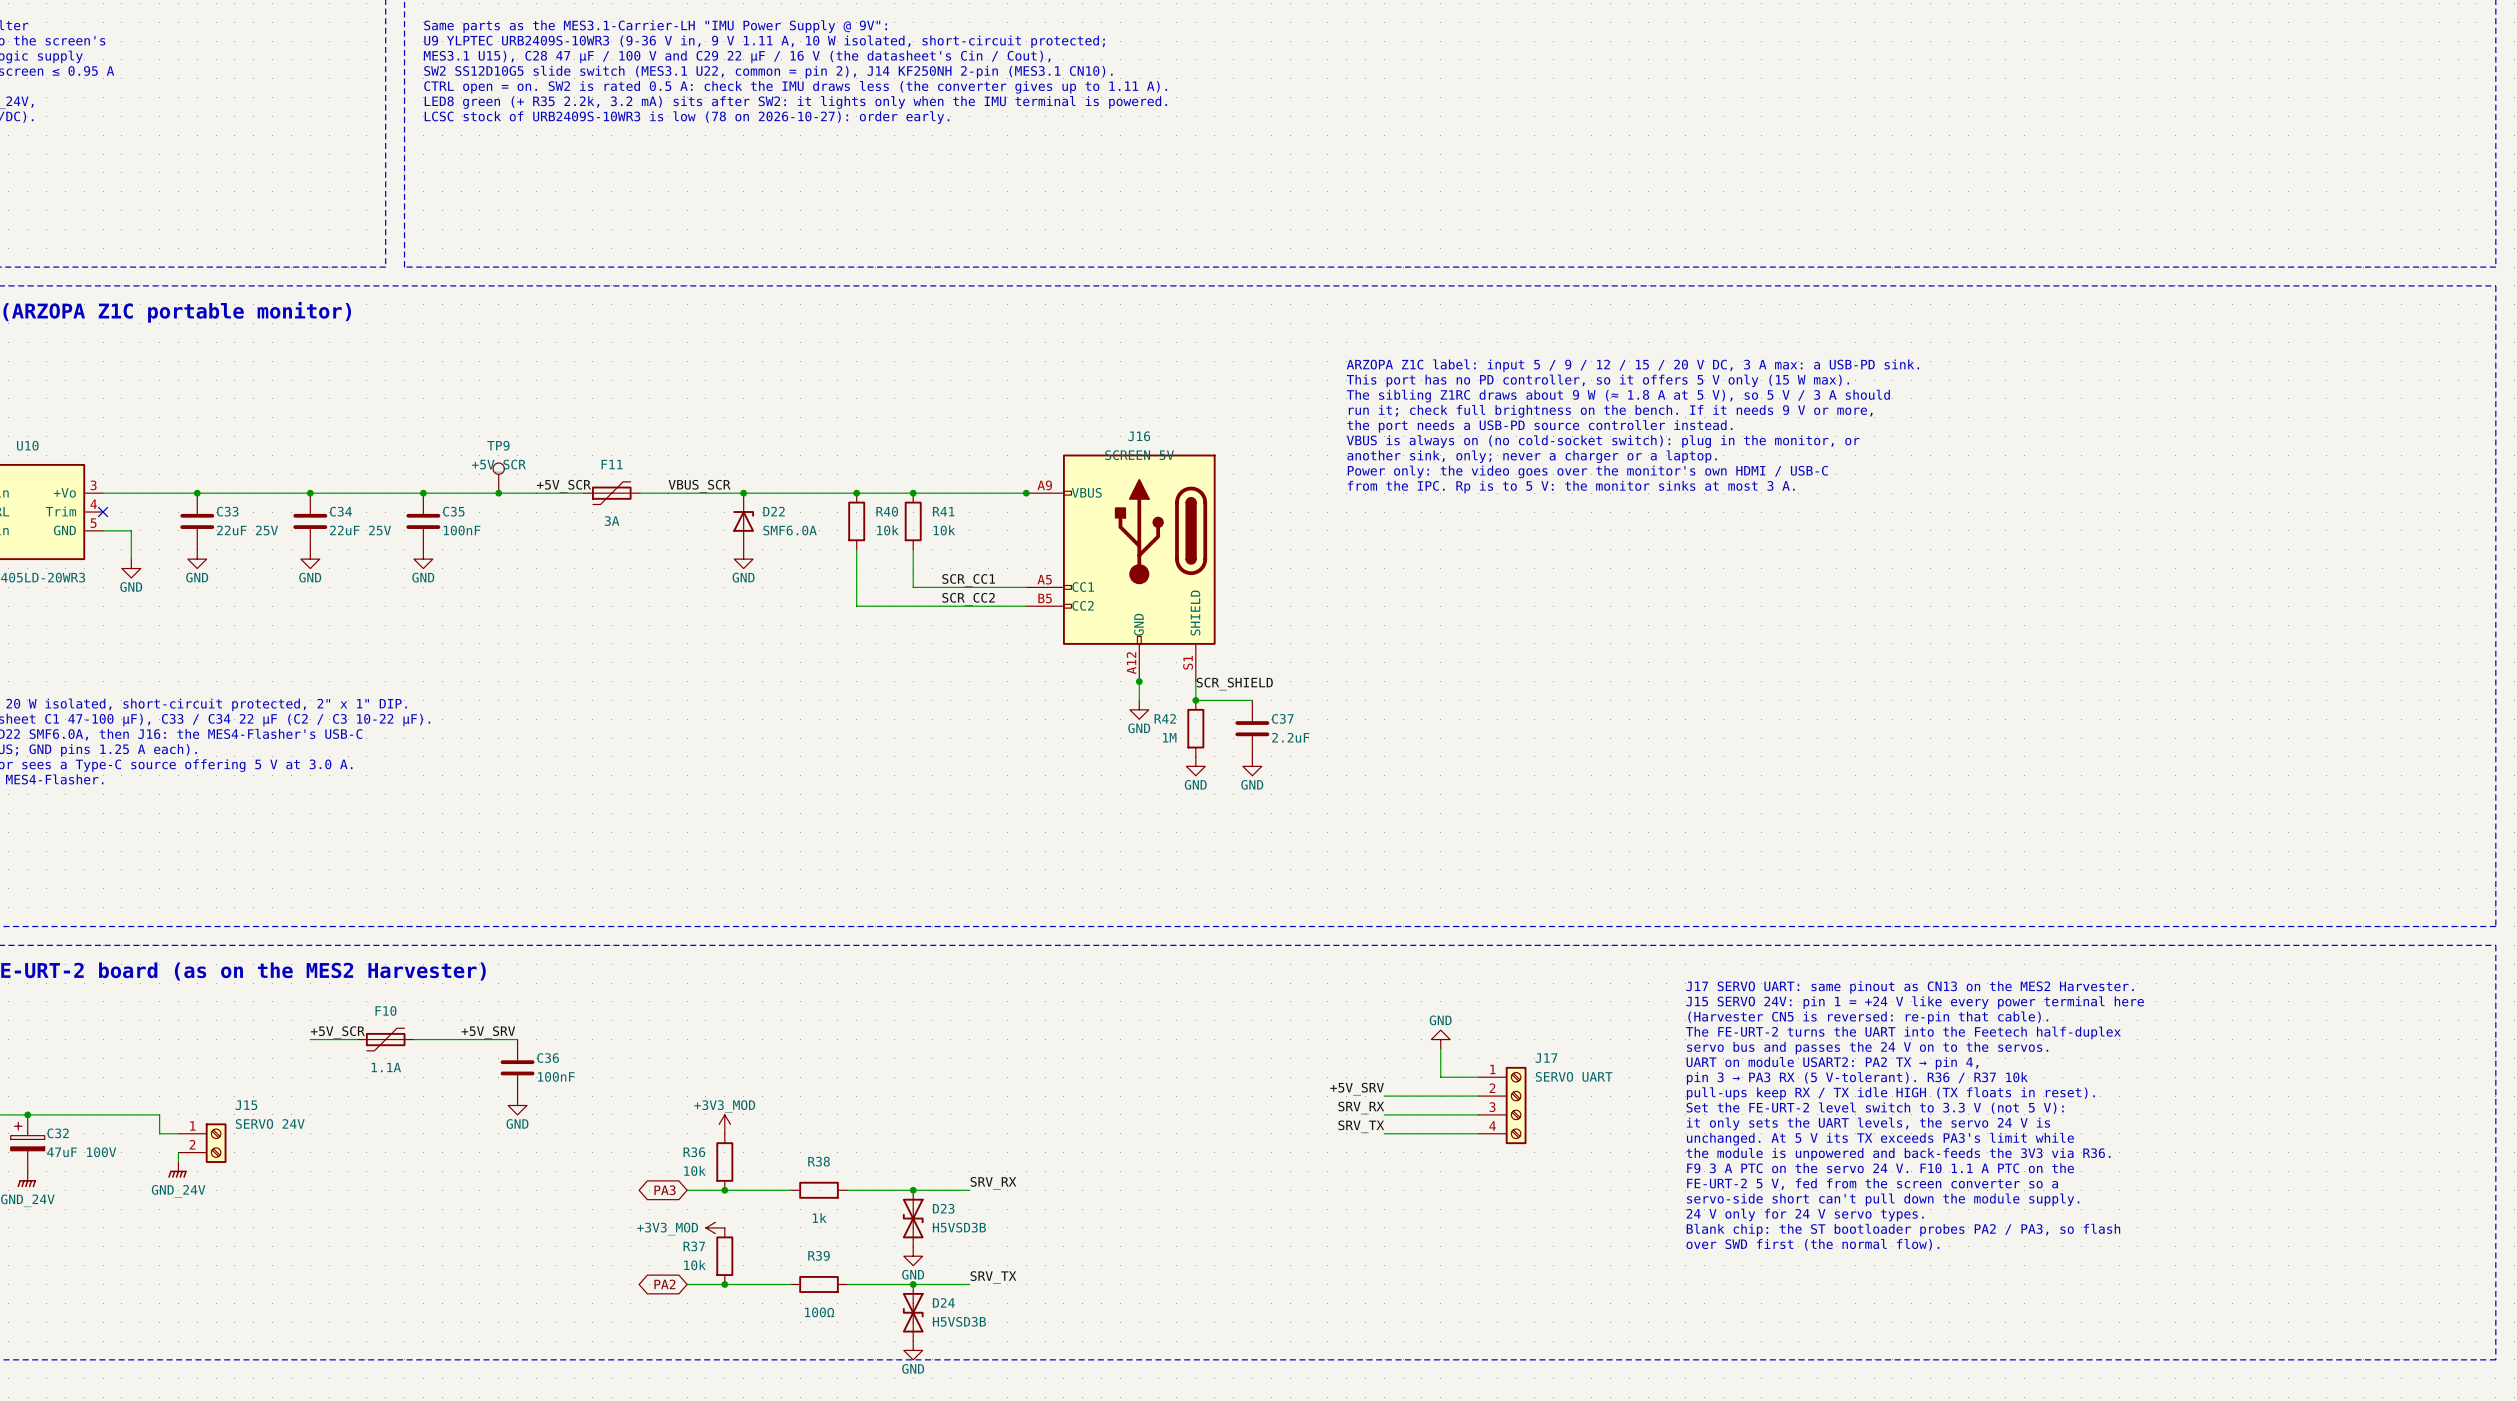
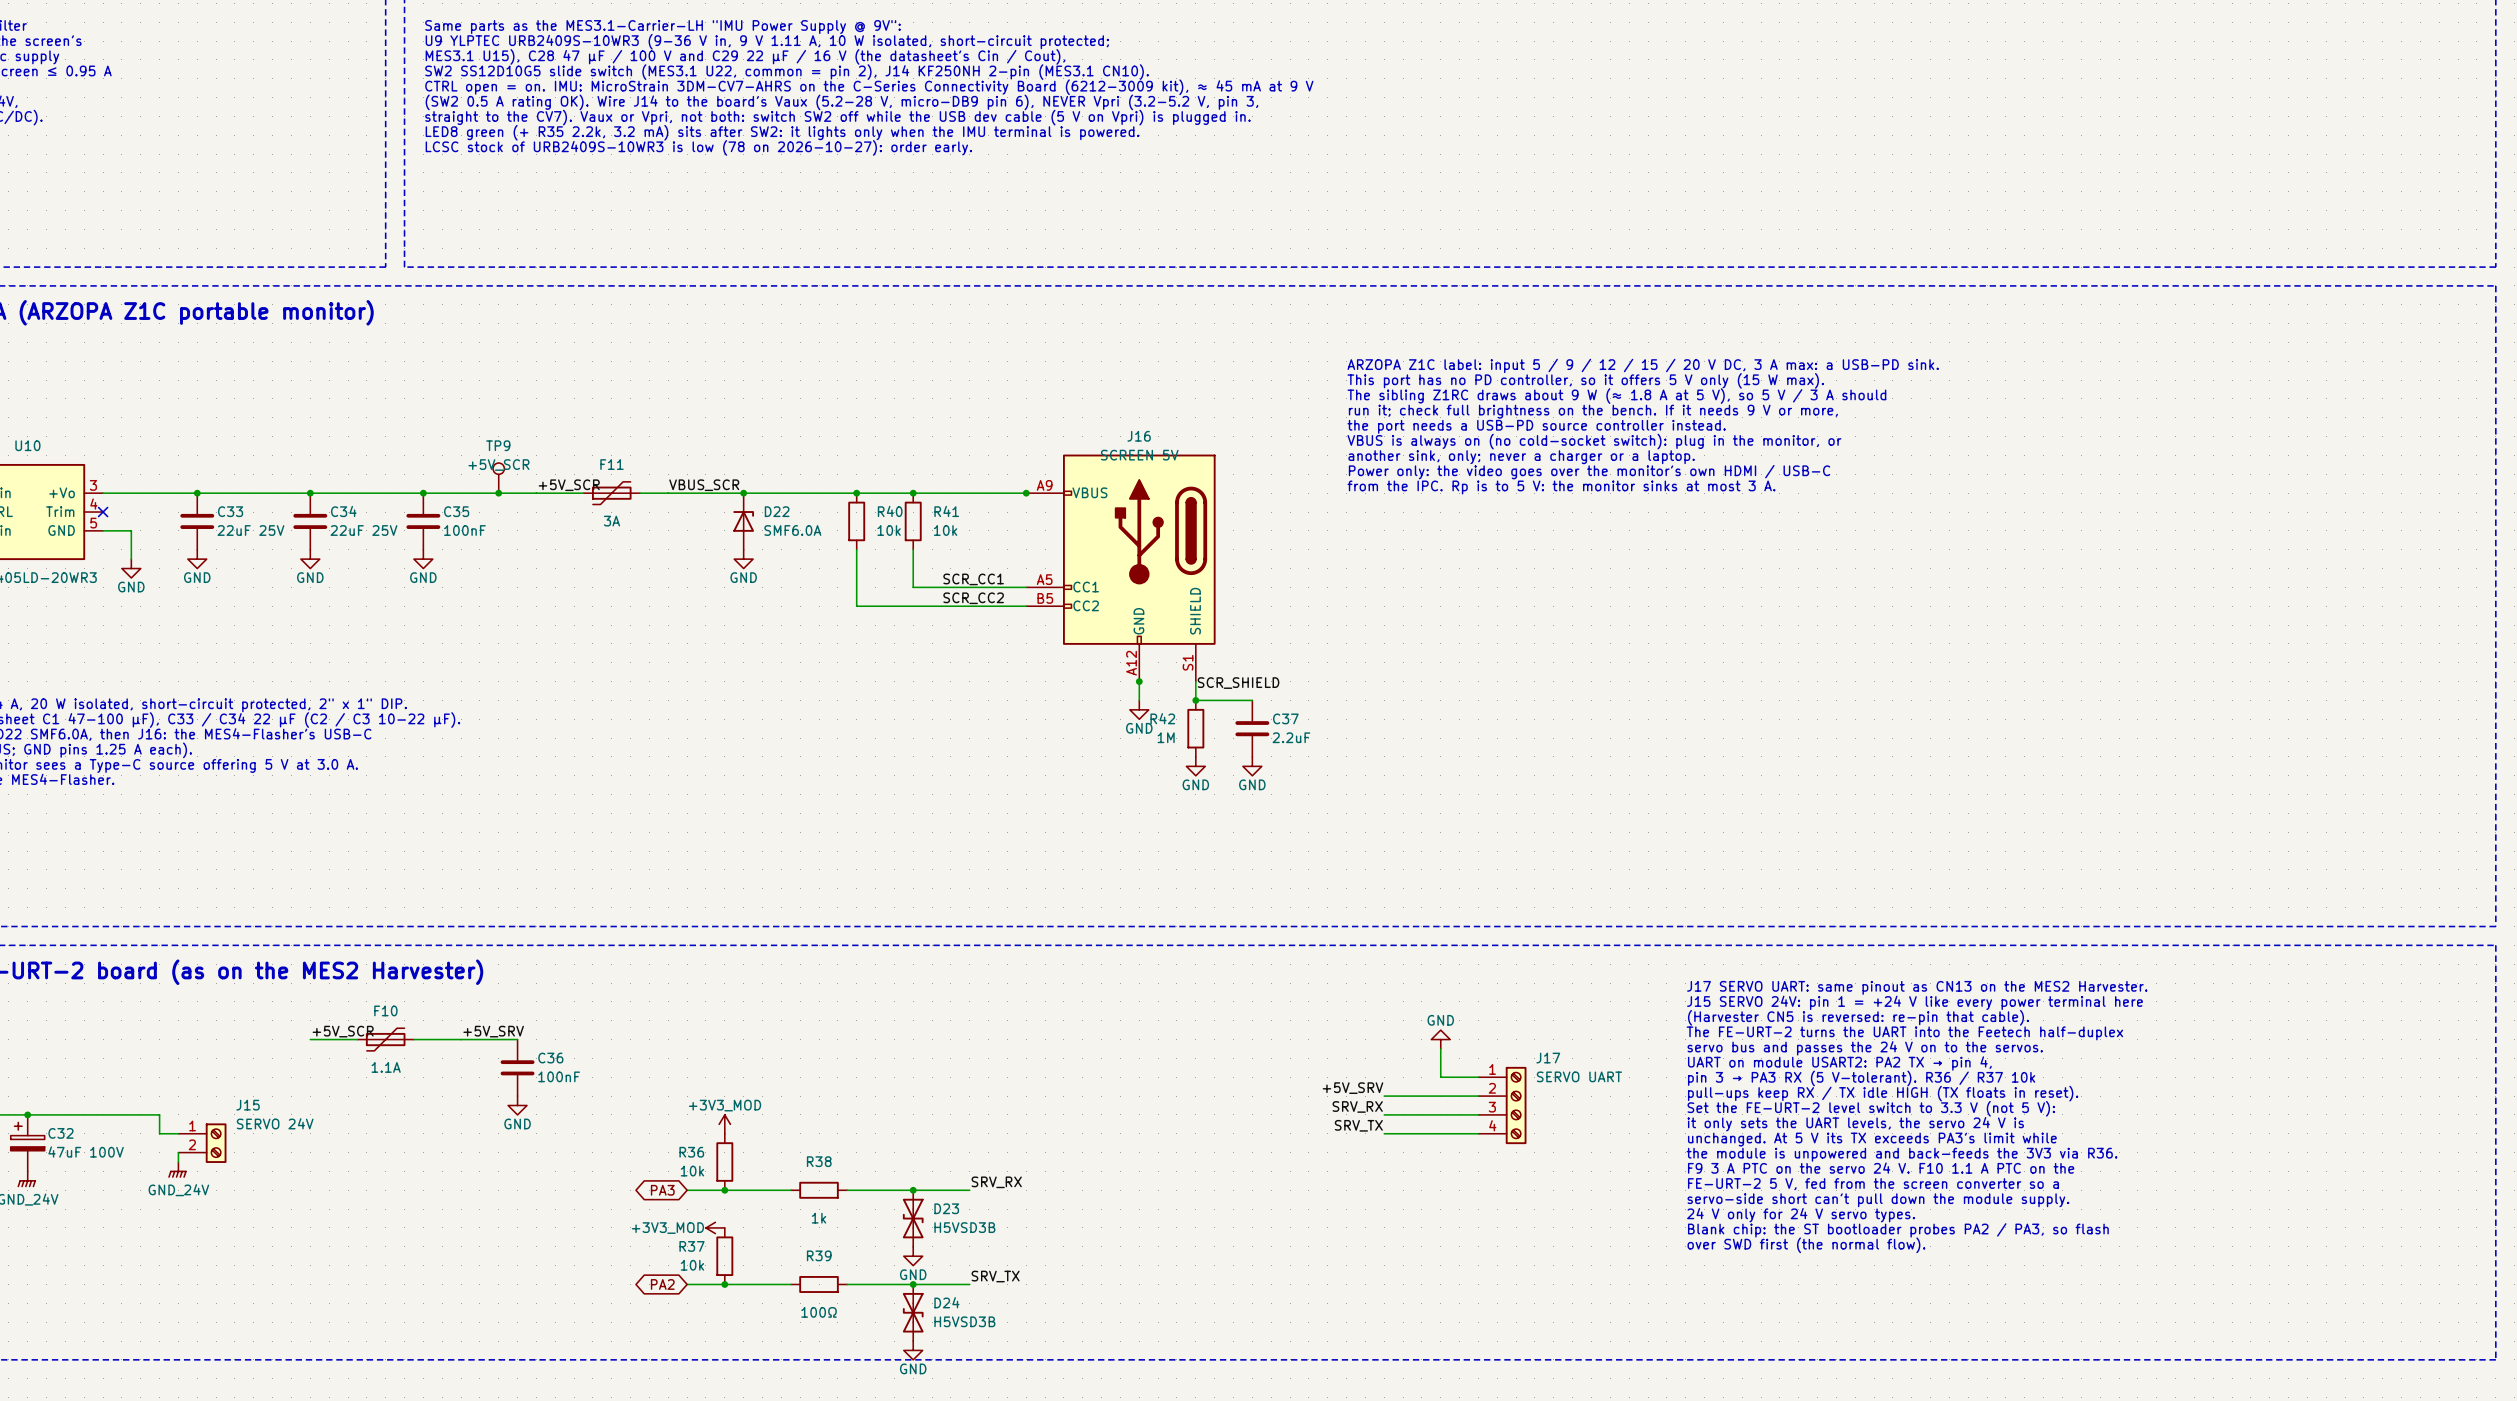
text: CTRL open = on. SW2 is rated 0.5 A: check the IMU draws less (the converter gives up to 1.11 A). (795, 87) -> CTRL open = on. IMU: MicroStrain 3DM-CV7-AHRS on the C-Series Connectivity Board (6212-3009 kit), ≈ 45 mA at 9 V (869, 87)
text: LED8 green (+ R35 2.2k, 3.2 mA) sits after SW2: it lights only when the IMU terminal is powered. (795, 102) -> (SW2 0.5 A rating OK). Wire J14 to the board's Vaux (5.2-28 V, micro-DB9 pin 6), NEVER Vpri (3.2-5.2 V, pin 3, (841, 102)
text: LCSC stock of URB2409S-10WR3 is low (78 on 2026-10-27): order early. (686, 117) -> straight to the CV7). Vaux or Vpri, not both: switch SW2 off while the USB dev cable (5 V on Vpri) is plugged in. (837, 117)
text: none -> LED8 green (+ R35 2.2k, 3.2 mA) sits after SW2: it lights only when the IMU terminal is powered. (782, 132)
text: none -> LCSC stock of URB2409S-10WR3 is low (78 on 2026-10-27): order early. (698, 147)

